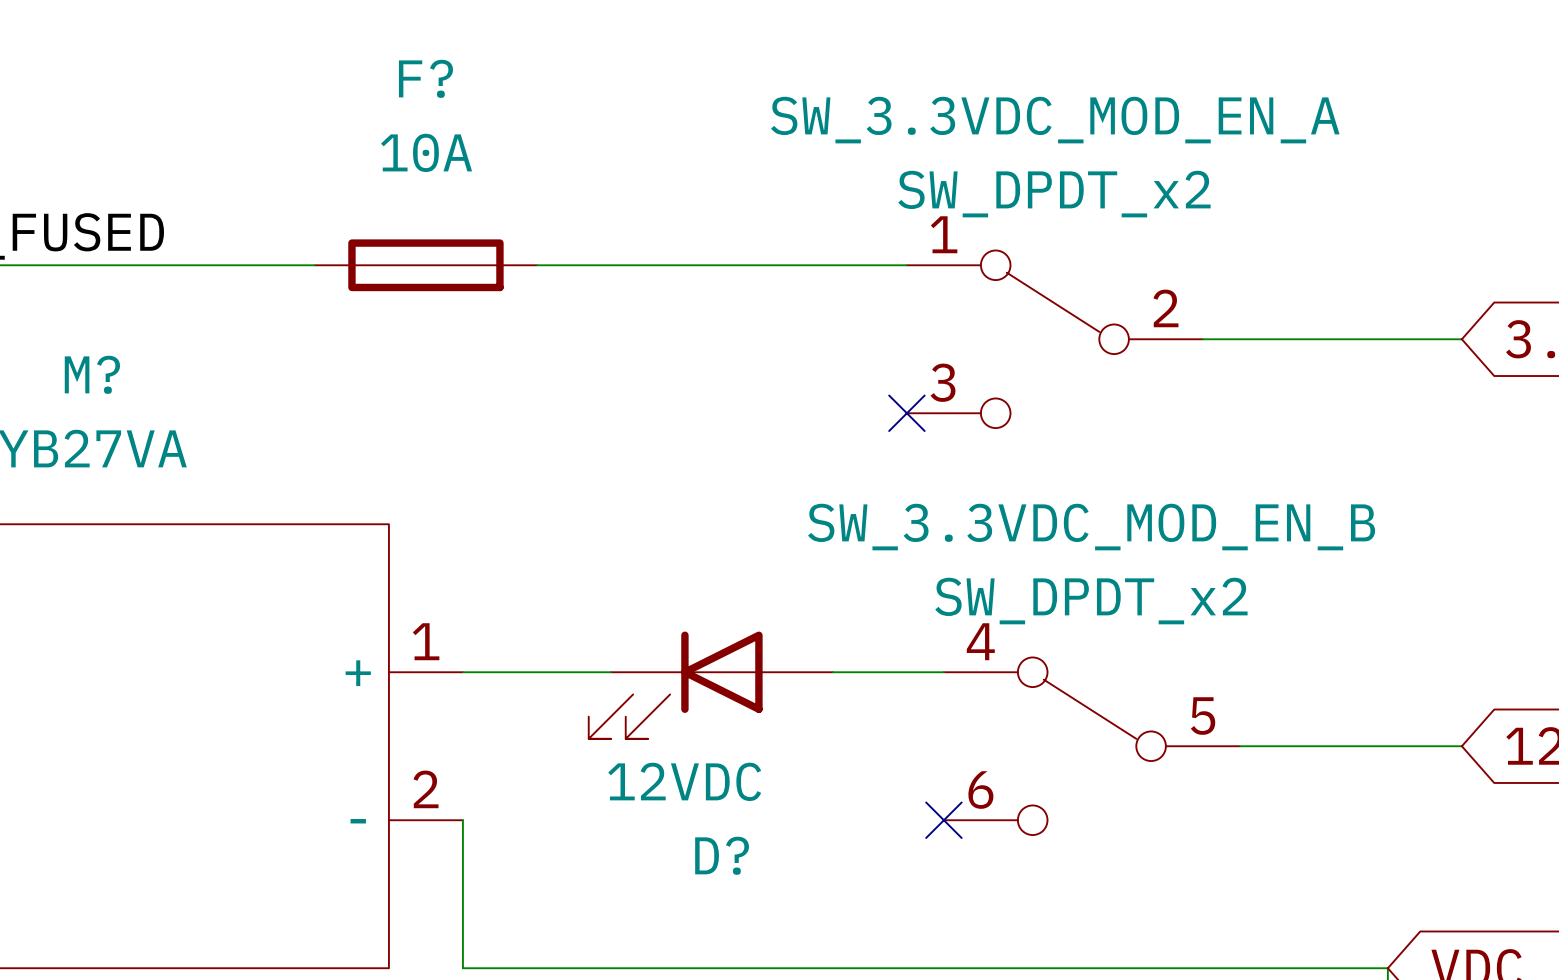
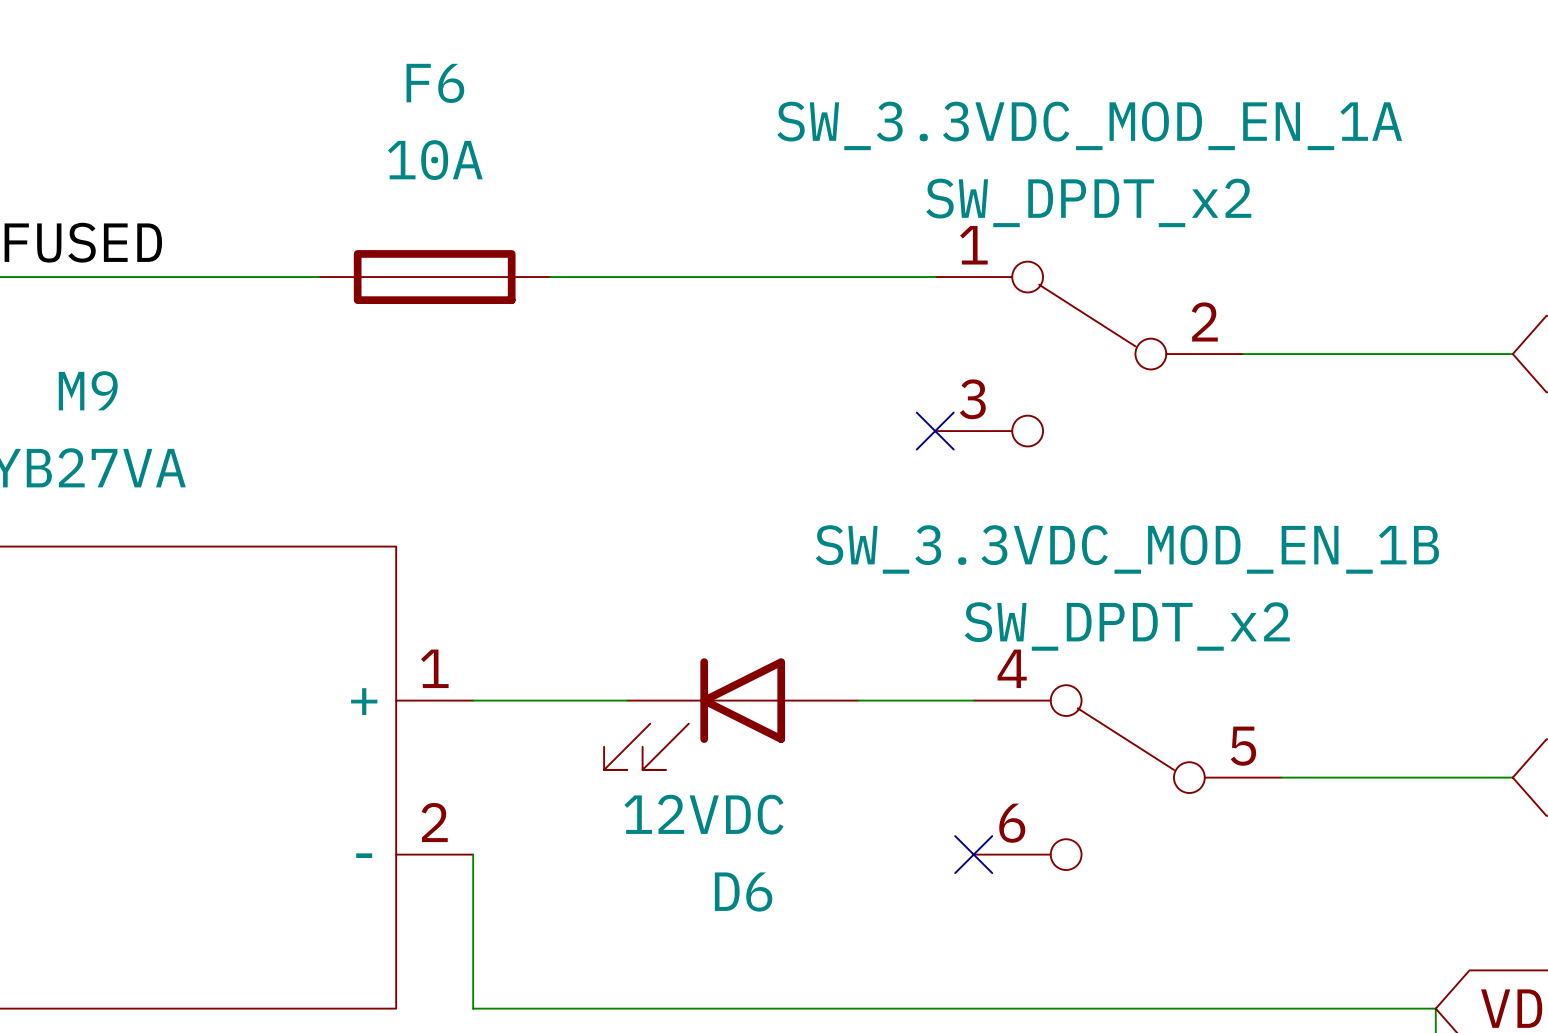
F? name: F? (425, 78) -> F6 (435, 83)
SW_3.3VDC_MOD_EN_A name: SW_3.3VDC_MOD_EN_A (1055, 120) -> SW_3.3VDC_MOD_EN_1A (1089, 125)
M? name: M? (92, 374) -> M9 (88, 390)
SW_3.3VDC_MOD_EN_B name: SW_3.3VDC_MOD_EN_B (1091, 527) -> SW_3.3VDC_MOD_EN_1B (1127, 549)
D? name: D? (722, 855) -> D6 (743, 892)

